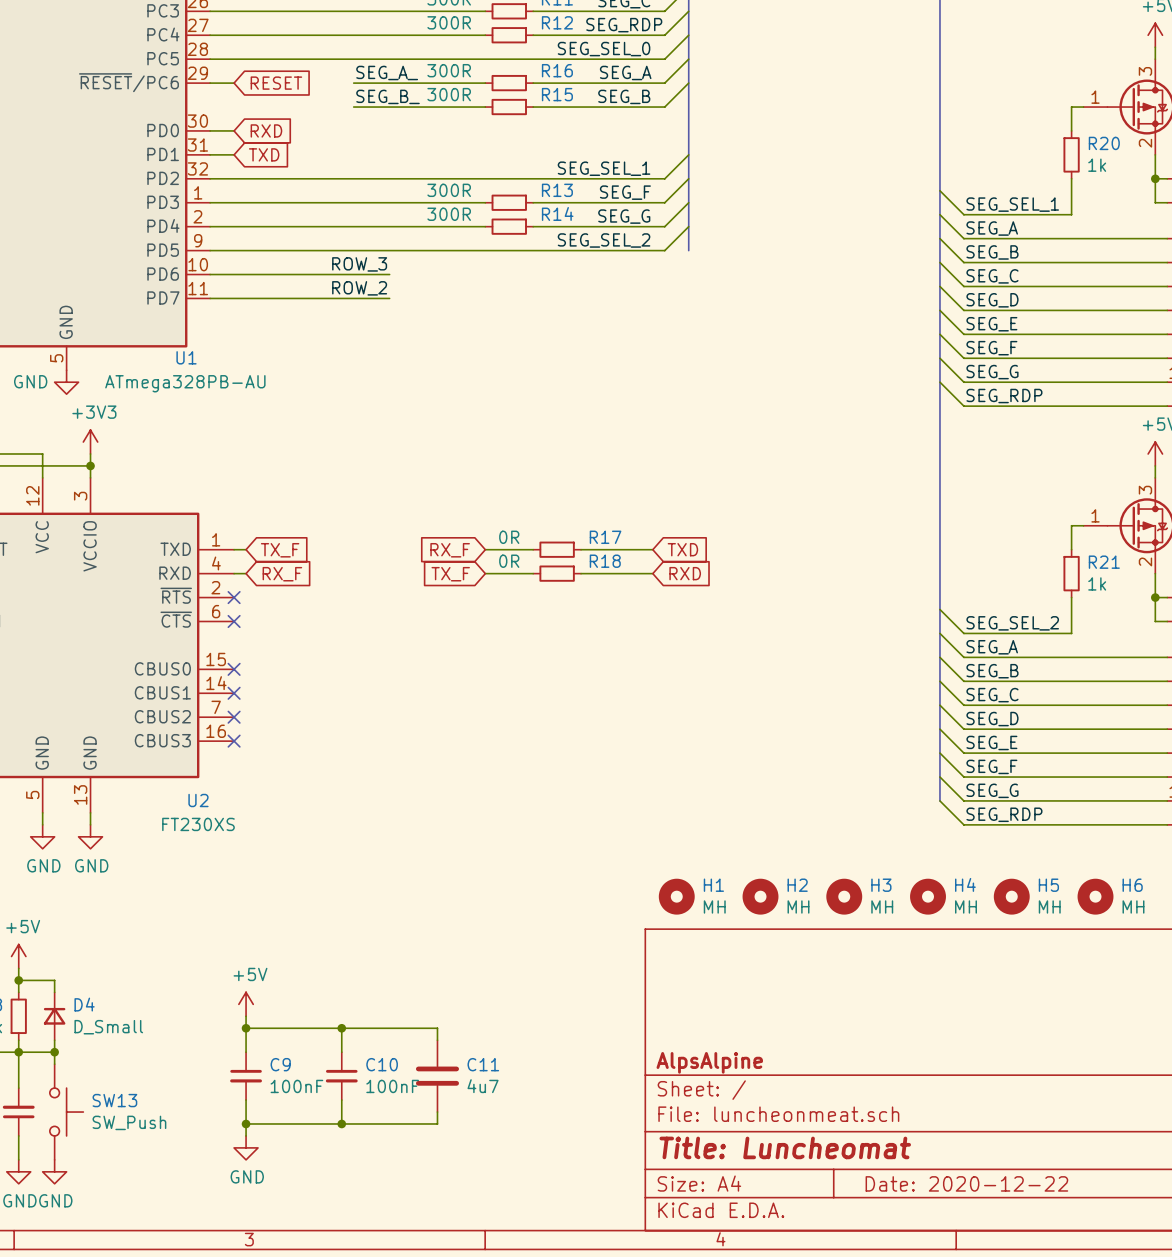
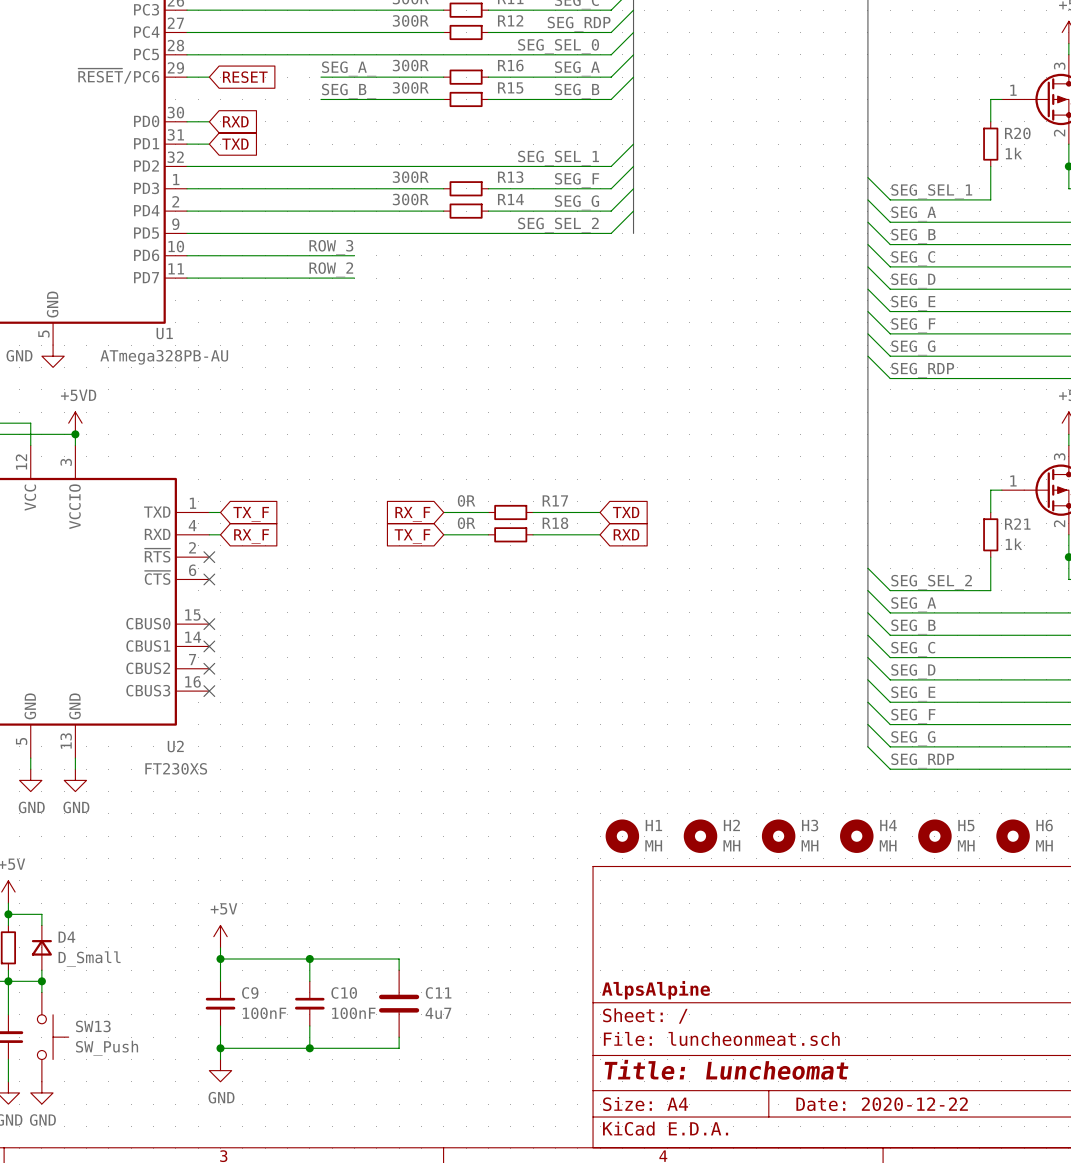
power symbol: +3V3 (90, 442) -> none
power symbol: none -> +5VD (75, 423)

